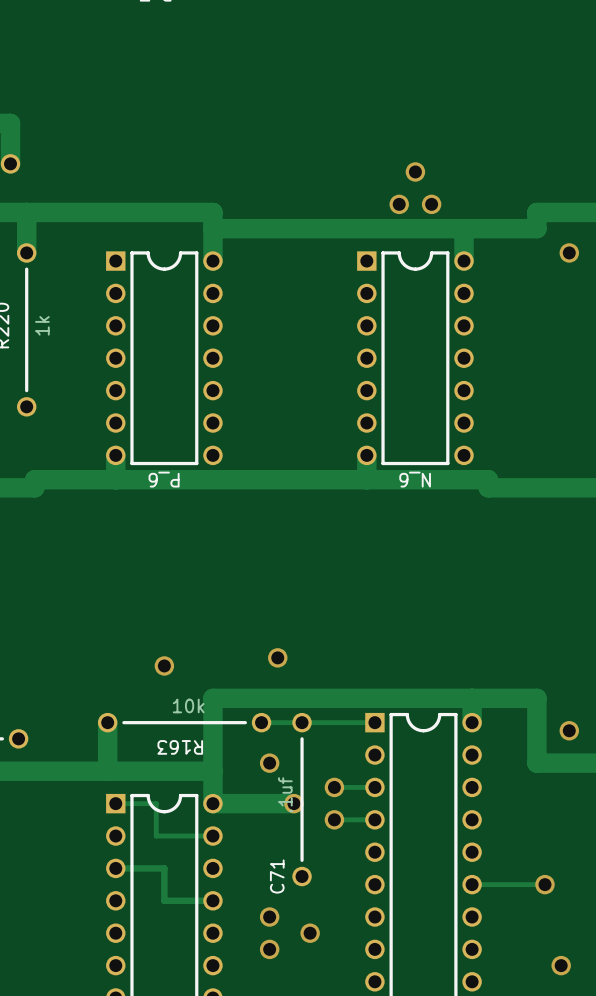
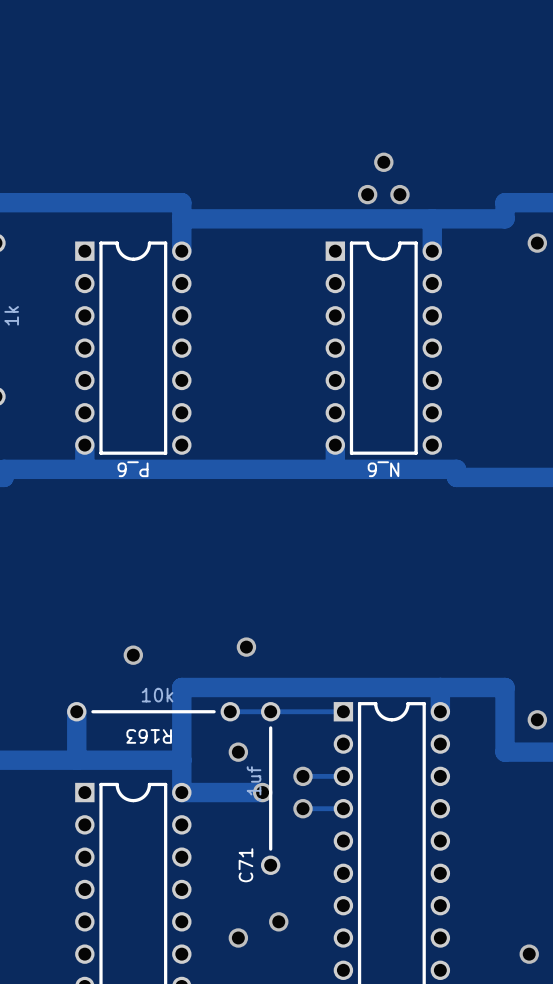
track: (115, 803) (156, 803) (156, 836) (212, 836) -> none
track: (115, 868) (164, 868) (164, 900) (212, 900) -> none
track: (472, 884) (544, 884) -> none
via: (544, 884) -> none
via: (269, 917) -> none

